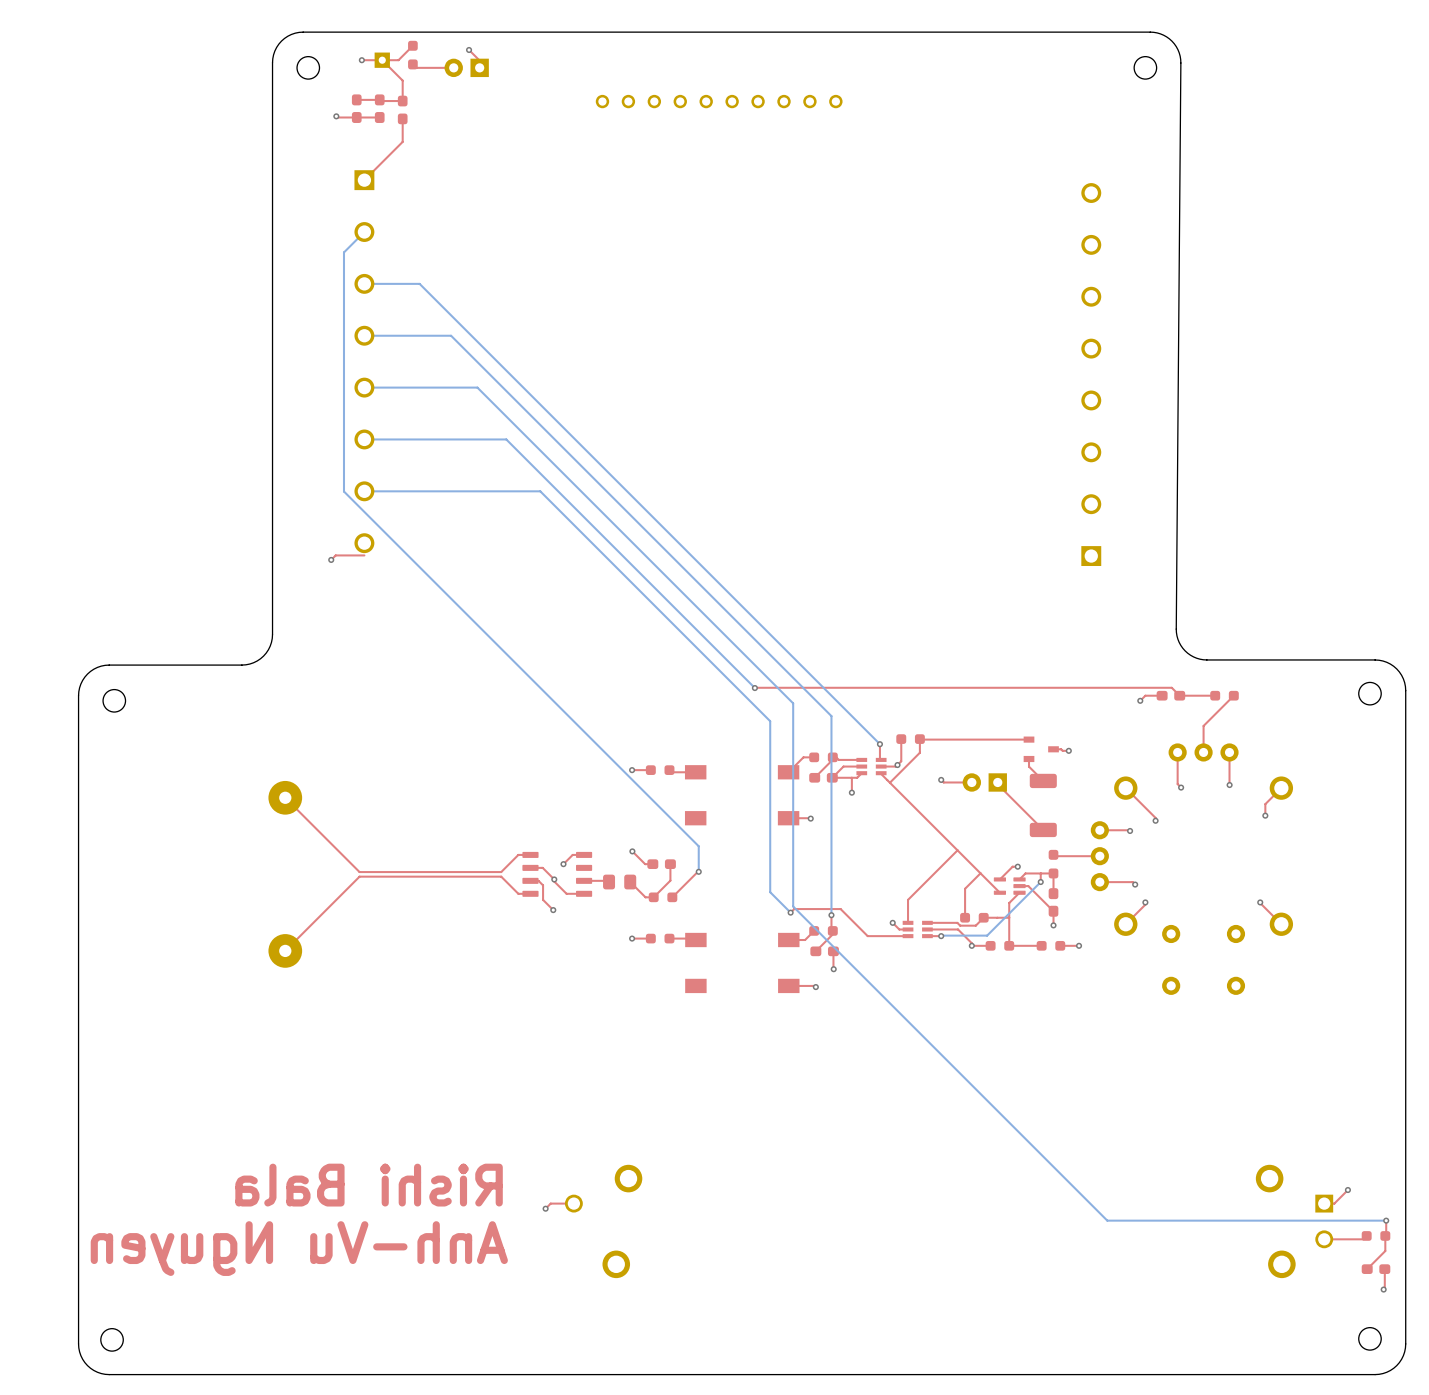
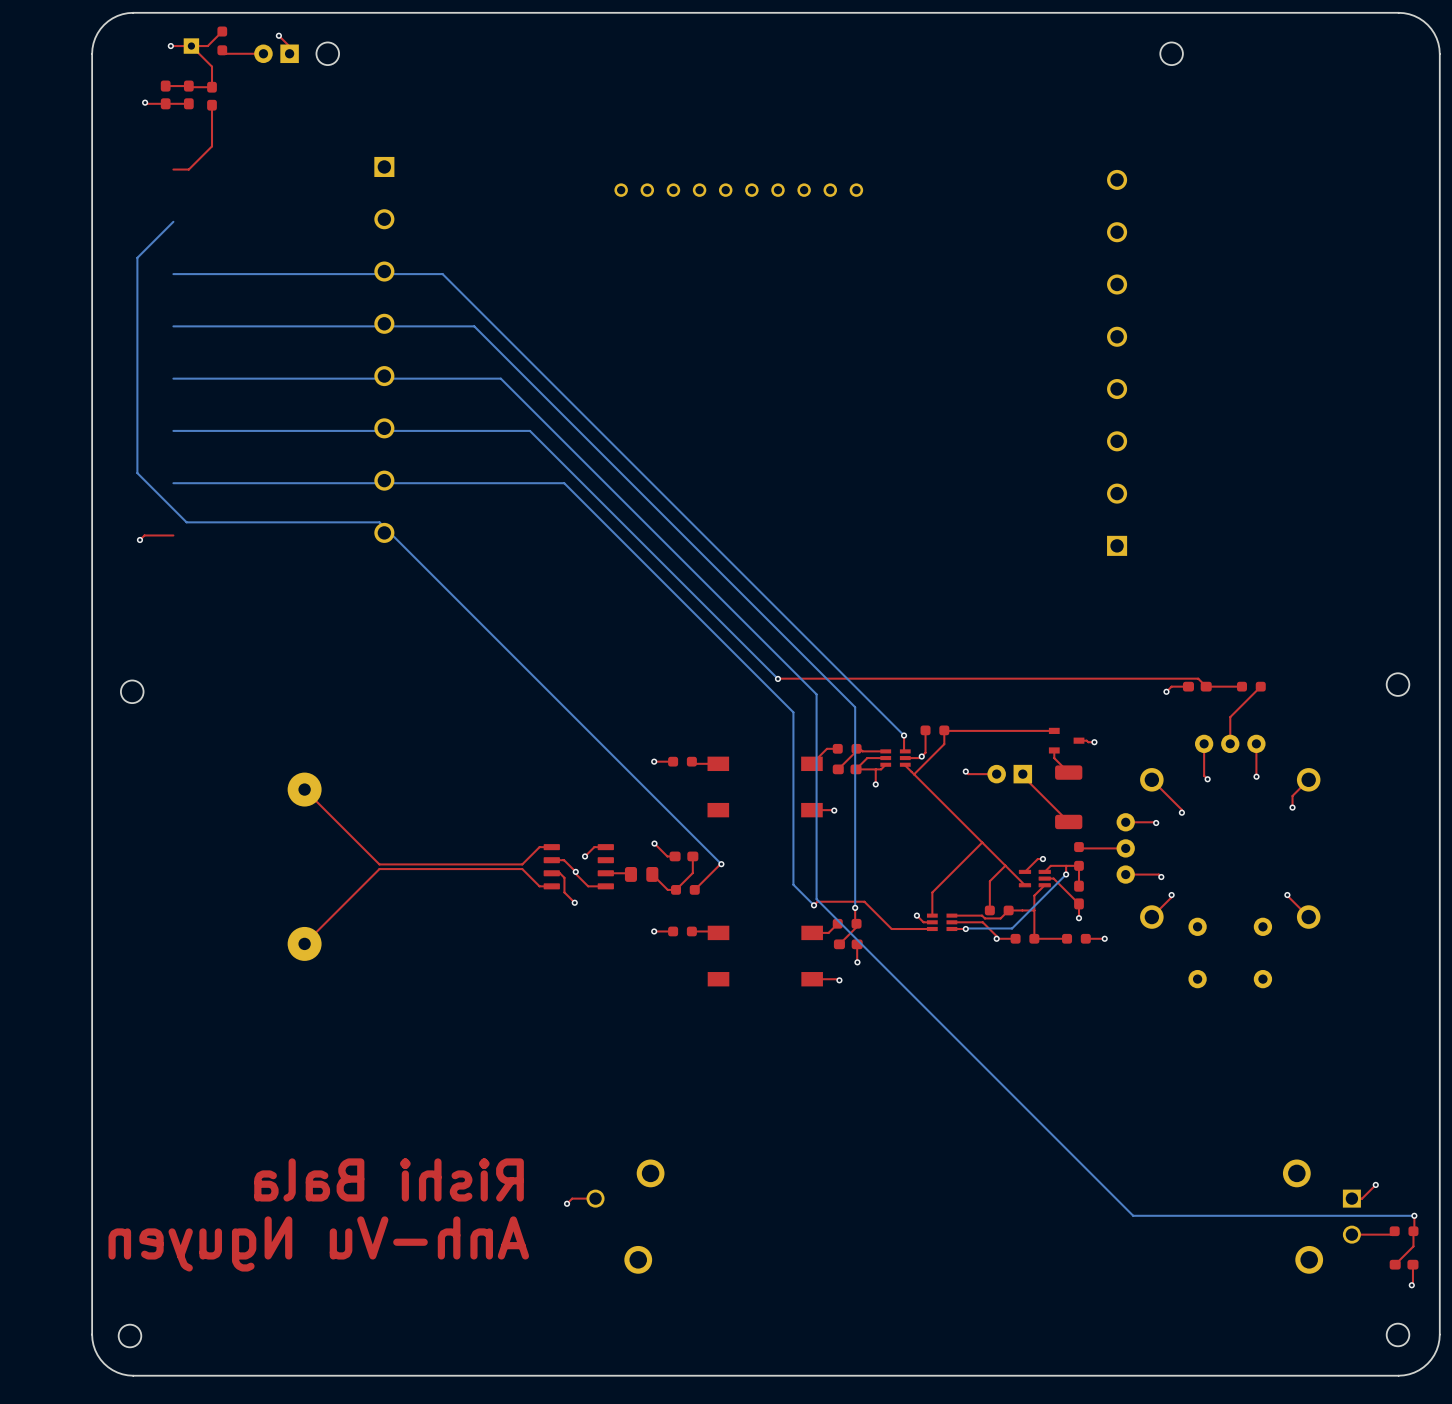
board edge: (1150, 32) (303, 32) (287, 36) (278, 44) (274, 51) (272, 62) (271, 642) (268, 649) (260, 658) (245, 664) (101, 666) (87, 674) (82, 680) (78, 691) (78, 1343) (82, 1359) (90, 1368) (101, 1373) (109, 1374) (1375, 1374) (1390, 1370) (1399, 1362) (1404, 1351) (1405, 1343) (1405, 686) (1399, 671) (1390, 664) (1383, 661) (1203, 659) (1187, 653) (1177, 639) (1176, 629) (1180, 63) (1177, 49) (1171, 41) (1163, 35) (1150, 32) -> (1398, 12) (1414, 15) (1427, 24) (1436, 38) (1439, 53) (1439, 1334) (1436, 1350) (1427, 1363) (1414, 1372) (1398, 1375) (133, 1375) (117, 1372) (104, 1363) (95, 1350) (92, 1334) (92, 53) (95, 38) (104, 24) (117, 15) (133, 12) (1398, 12)
top track: (412, 45) (398, 60) (361, 60) -> (222, 31) (207, 46) (170, 46)
via: none -> (278, 35)
top track: (469, 49) (479, 60) (479, 67) -> (278, 35) (289, 46) (289, 53)
via: (469, 49) -> none
part position: (412, 55) -> (222, 40)
via: none -> (170, 46)
via: (361, 60) -> none
top track: (382, 60) (402, 80) (402, 101) (356, 99) -> (191, 46) (212, 66) (212, 87) (165, 86)
part position: (382, 60) -> (191, 46)
top track: (412, 64) (416, 67) (453, 67) -> (222, 50) (225, 53) (263, 53)
part position: (466, 67) -> (276, 53)
part position: (719, 101) -> (738, 190)
part: none -> (165, 94)
part: none -> (188, 94)
part: (356, 108) -> none
part: (379, 108) -> none
part position: (402, 109) -> (212, 96)
via: none -> (145, 102)
top track: (336, 116) (379, 117) -> (145, 102) (188, 103)
via: (336, 116) -> none
top track: none -> (212, 105) (212, 146) (188, 169) (173, 169)
top track: (402, 118) (402, 141) (364, 180) -> none
bottom track: (364, 232) (343, 252) (343, 491) (698, 846) (698, 871) -> (173, 221) (137, 257) (137, 473) (186, 522) (379, 522) (721, 864)
bottom track: (364, 283) (419, 283) (422, 286) -> (173, 274) (442, 274)
bottom track: (364, 335) (451, 335) (453, 338) -> (173, 326) (474, 326)
bottom track: (364, 387) (477, 387) (479, 390) -> (173, 378) (500, 378)
bottom track: (364, 439) (506, 439) (508, 442) -> (173, 430) (529, 430)
bottom track: (364, 491) (540, 491) (542, 493) -> (173, 483) (564, 483)
via: none -> (139, 540)
top track: (364, 555) (335, 555) (331, 559) -> (173, 535) (144, 535) (139, 540)
via: (331, 559) -> none

